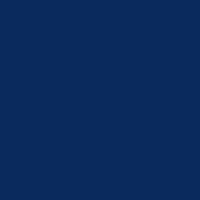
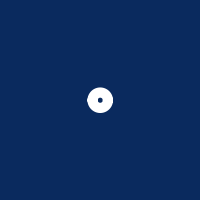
part: none -> (100, 100)

